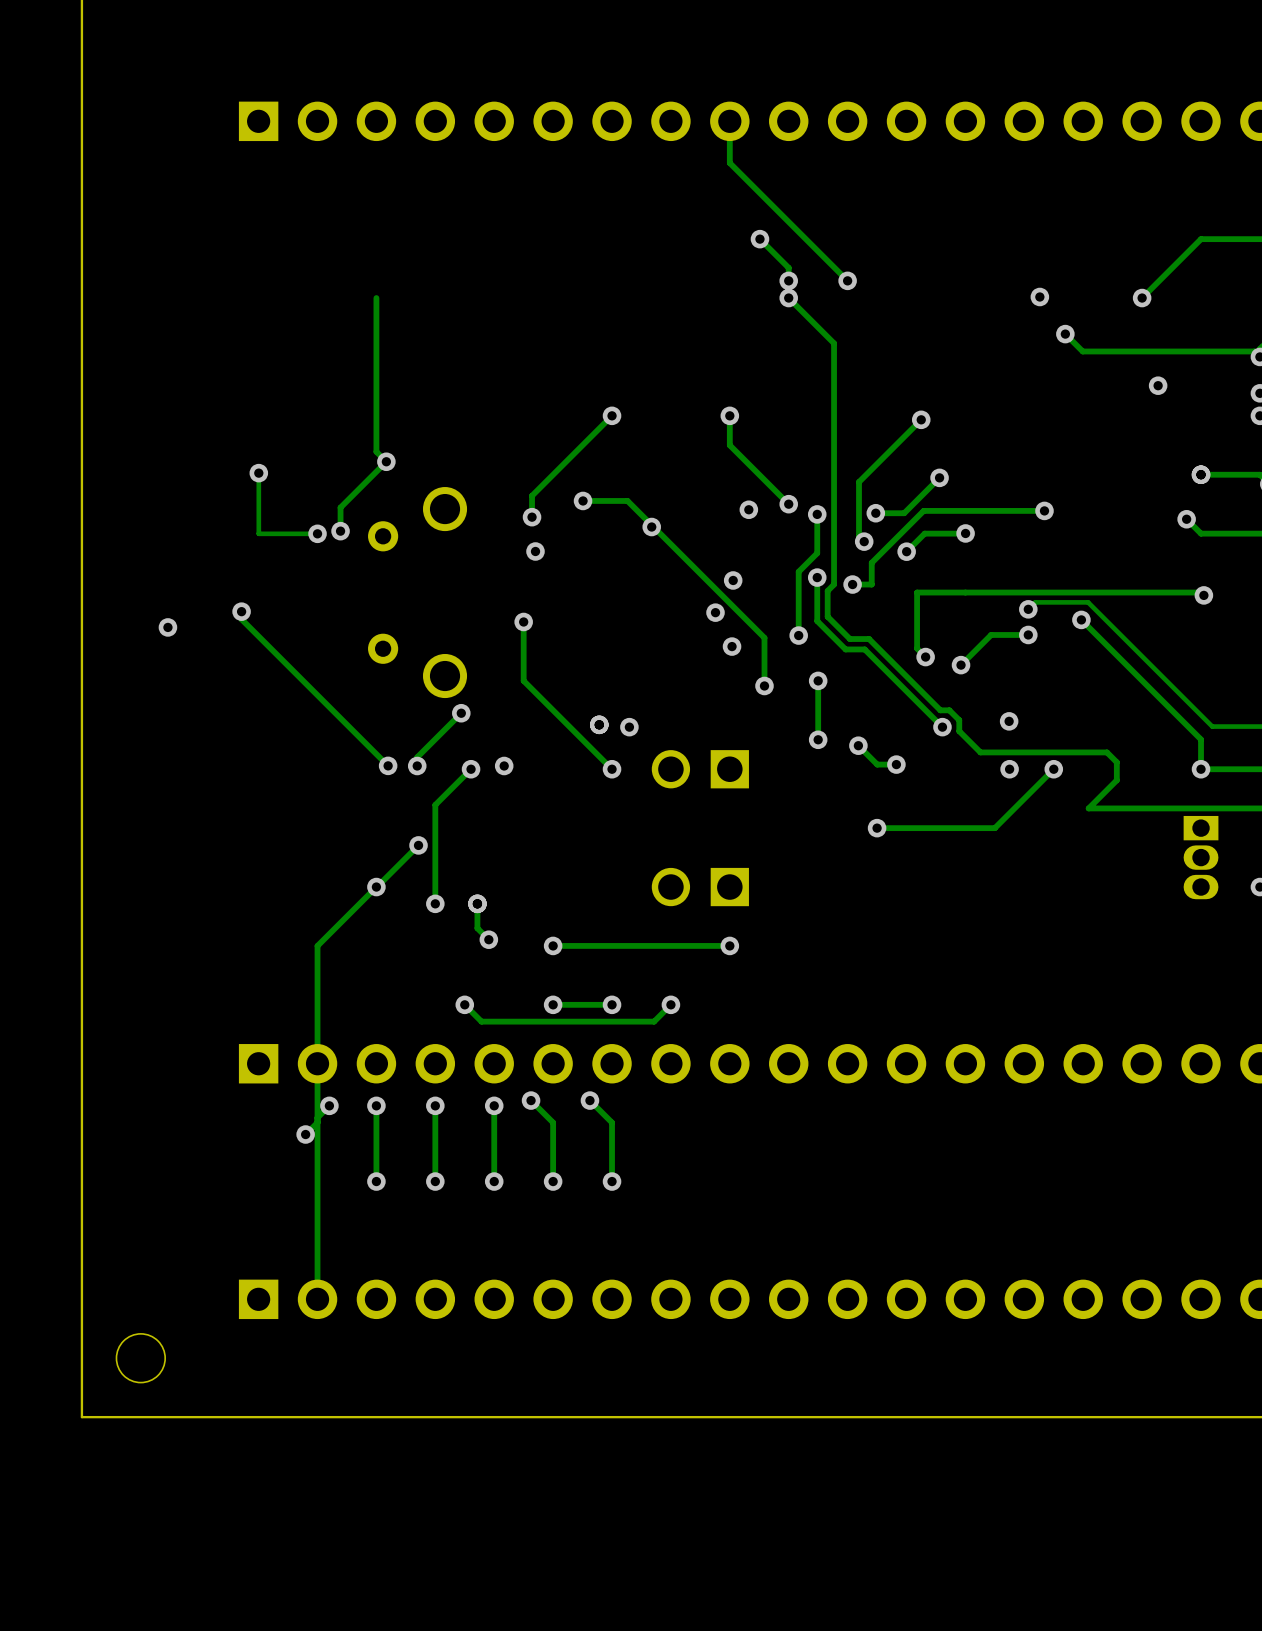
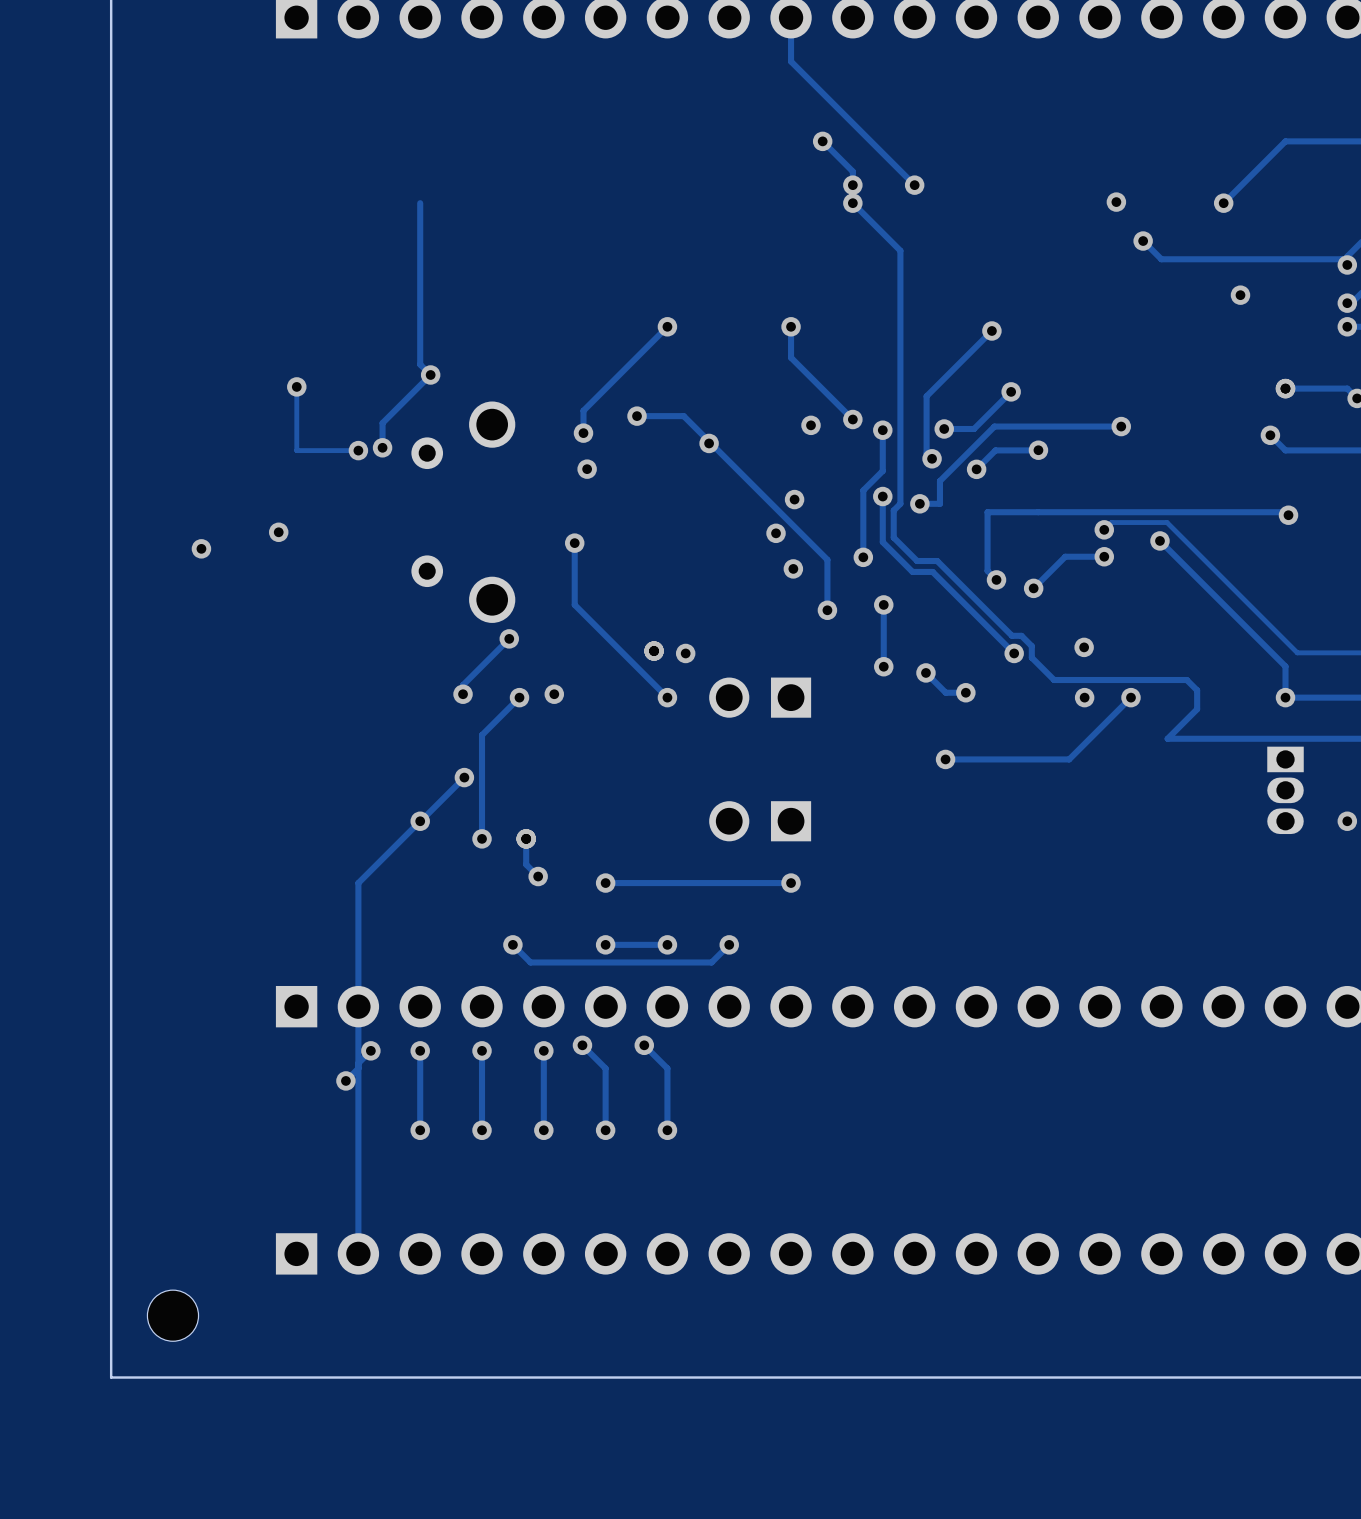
track: (241, 611) (241, 619) (388, 765) -> none
via: (388, 765) -> none

